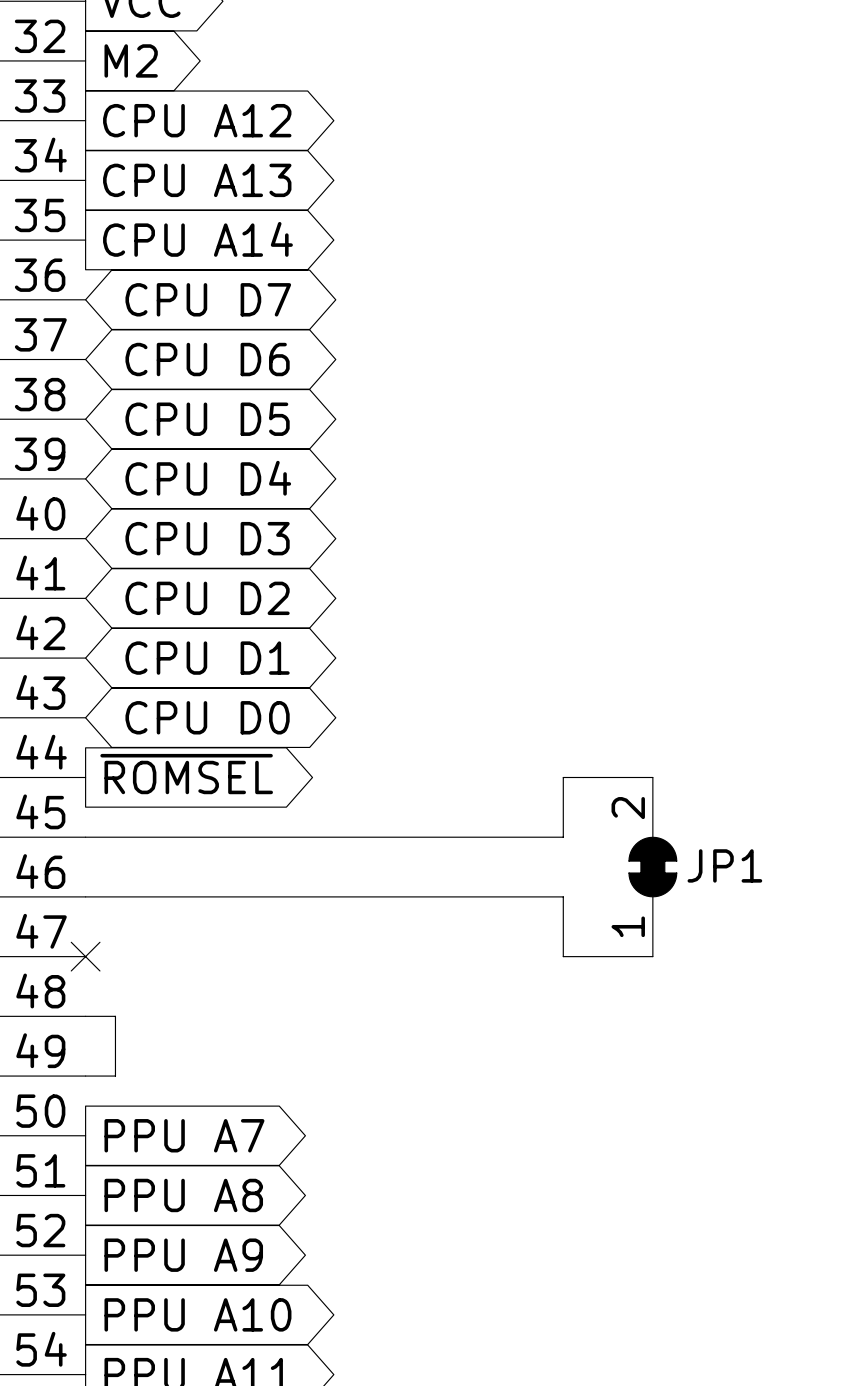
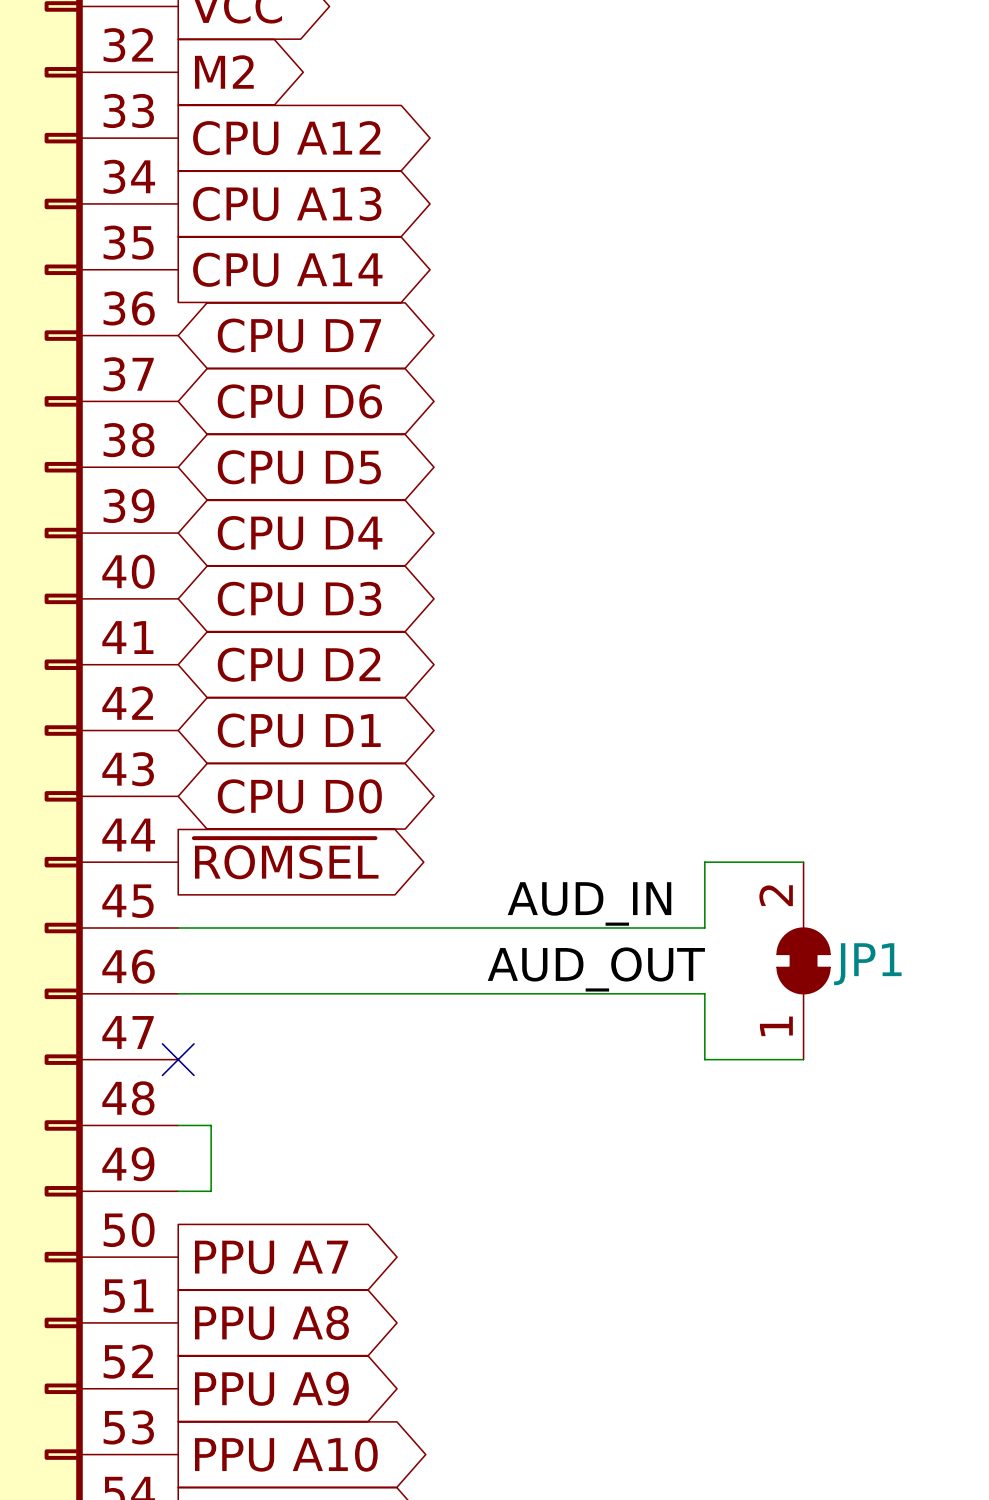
label: none -> AUD_IN (589, 903)
label: none -> AUD_OUT (596, 969)

